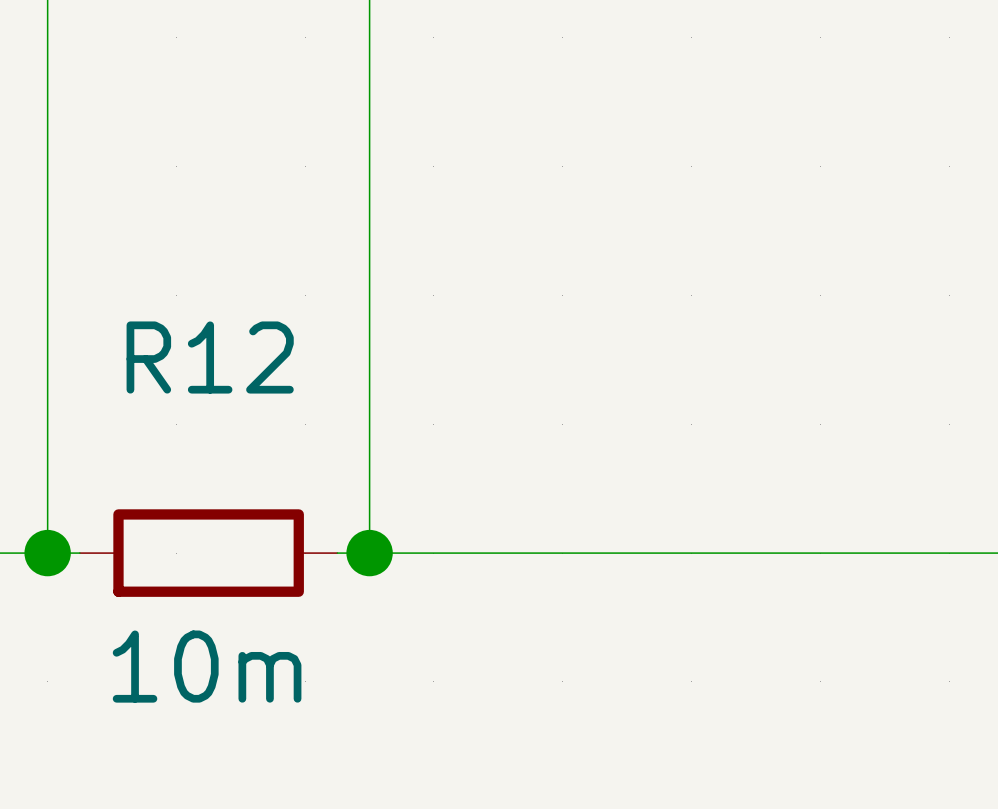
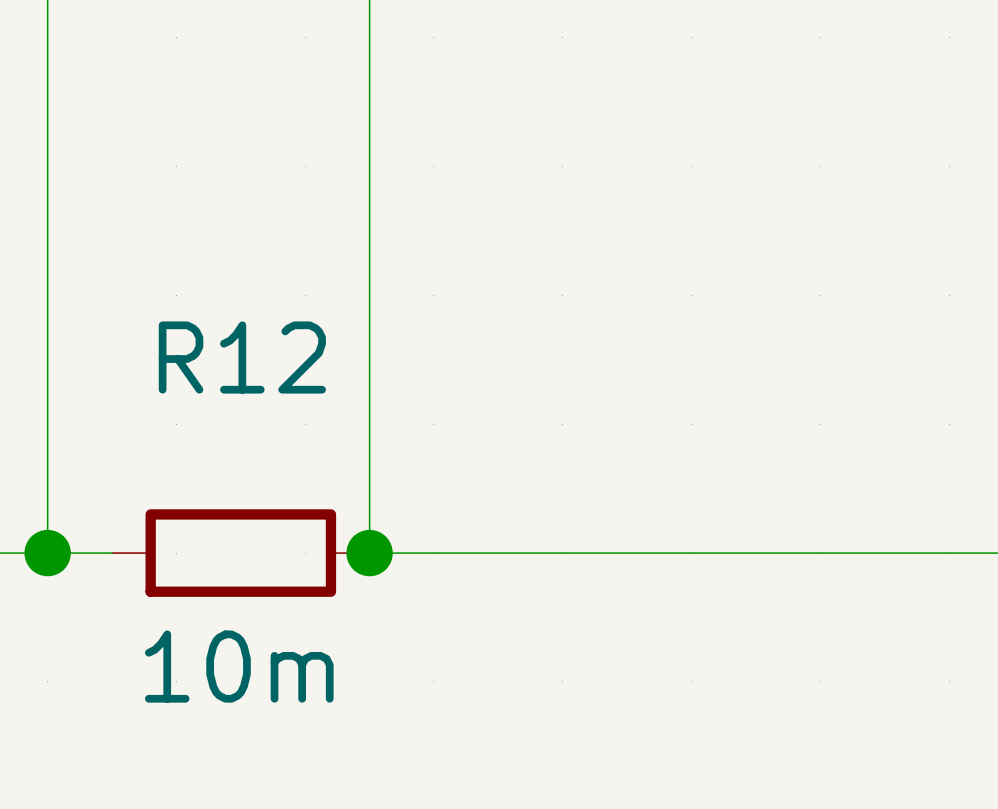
R12 position: (208, 553) -> (240, 553)

